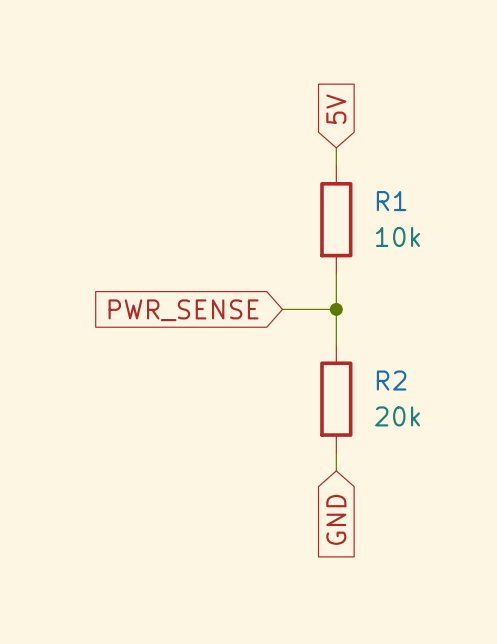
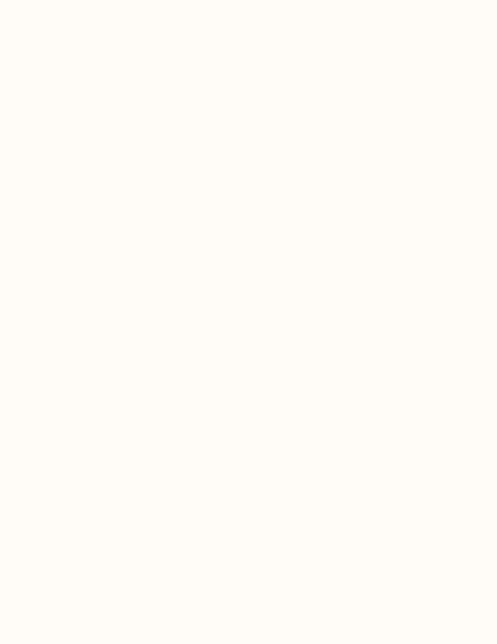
global label: 5V (336, 109) -> none
wire: (336, 147) (336, 165) -> none
R1: 10k (336, 219) -> none
wire: (336, 273) (336, 345) -> none
wire: (282, 309) (336, 309) -> none
junction: (336, 309) -> none
global label: PWR_SENSE (183, 310) -> none
R2: 20k (336, 399) -> none
wire: (336, 452) (336, 470) -> none
global label: GND (336, 519) -> none

